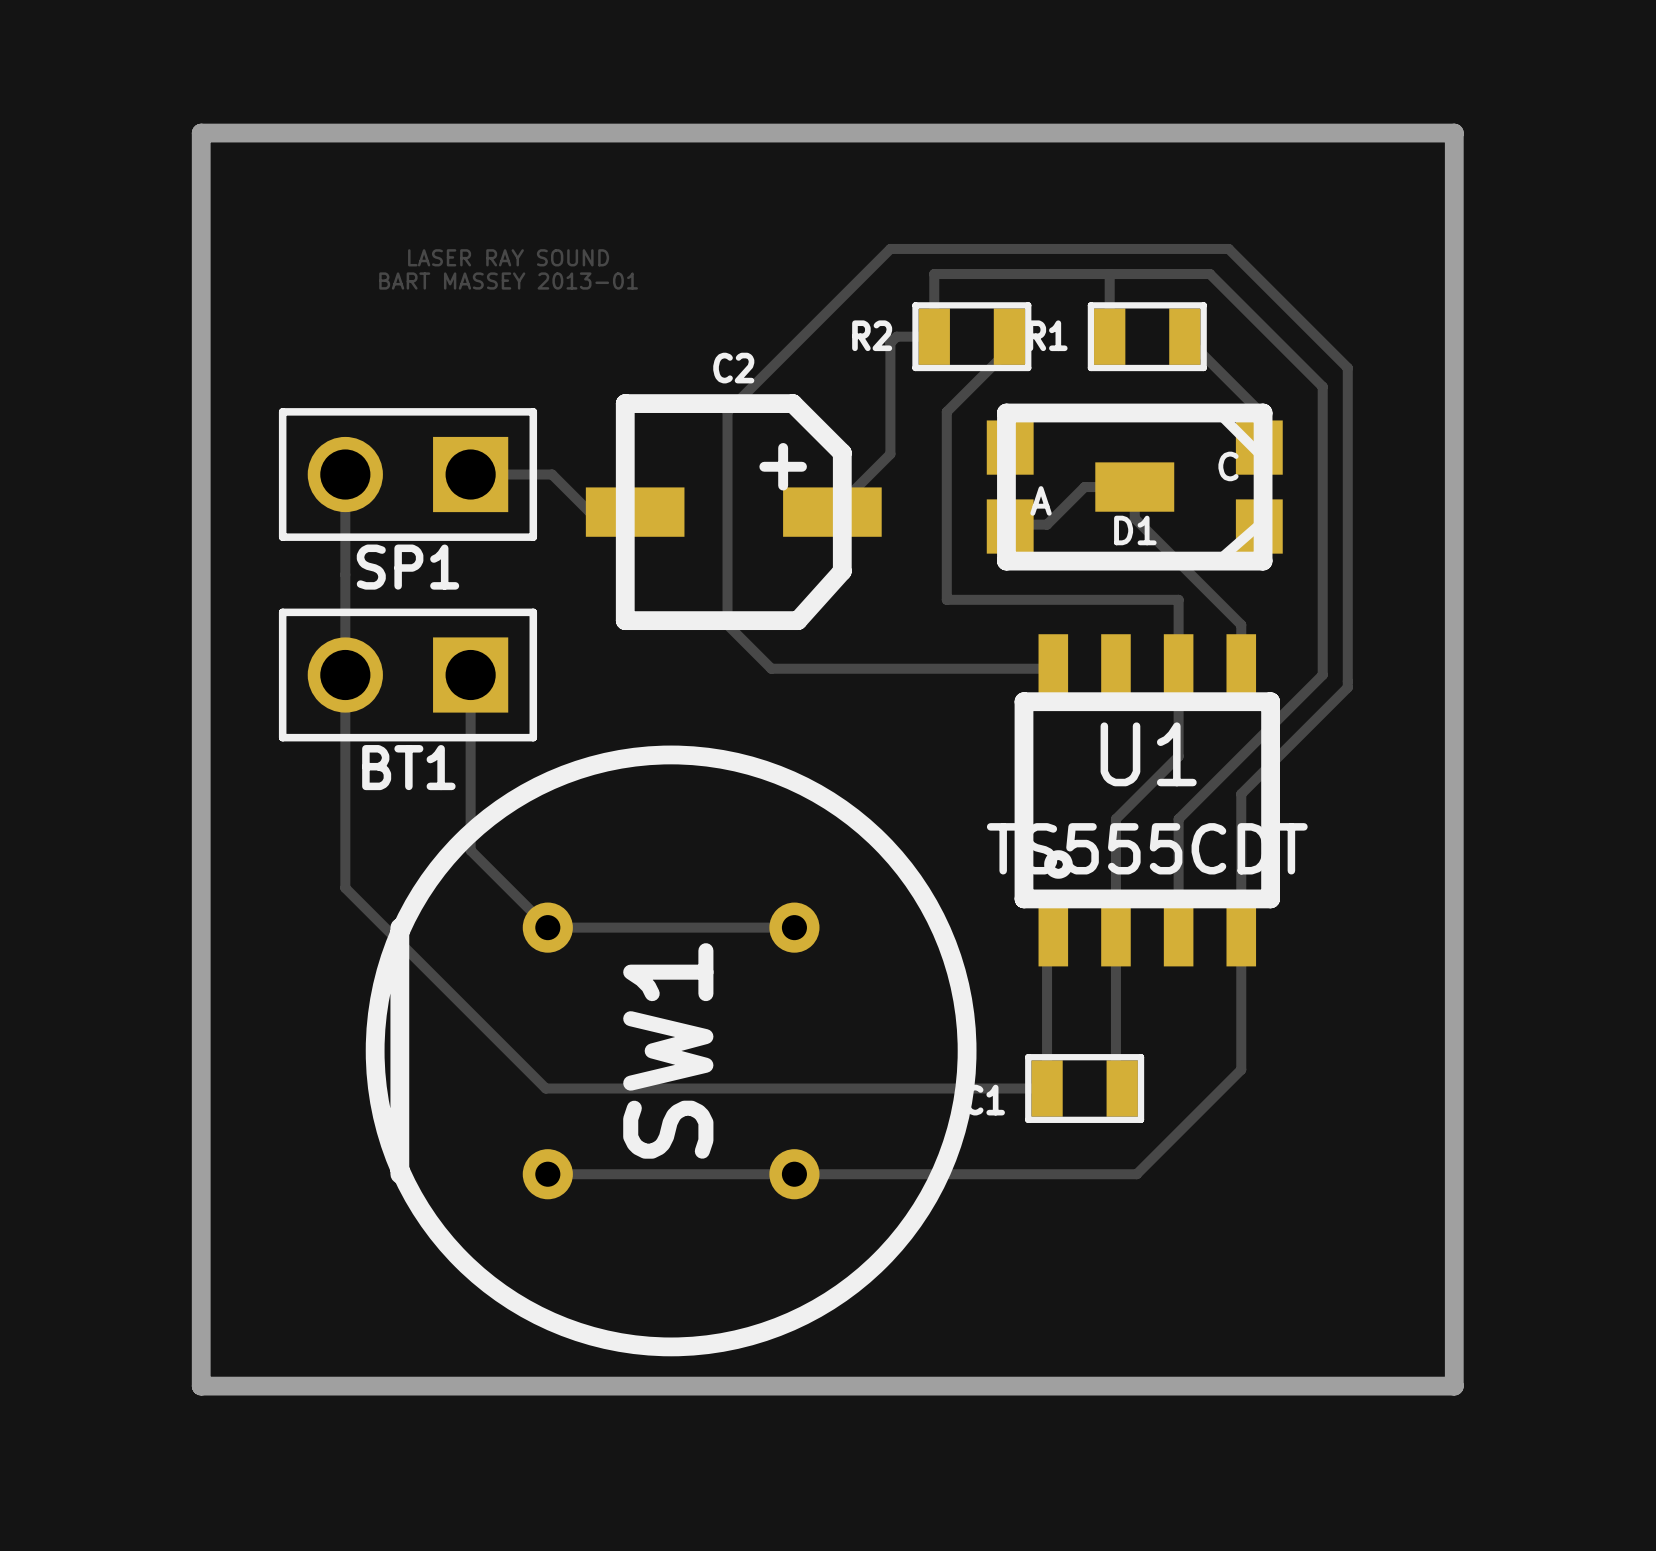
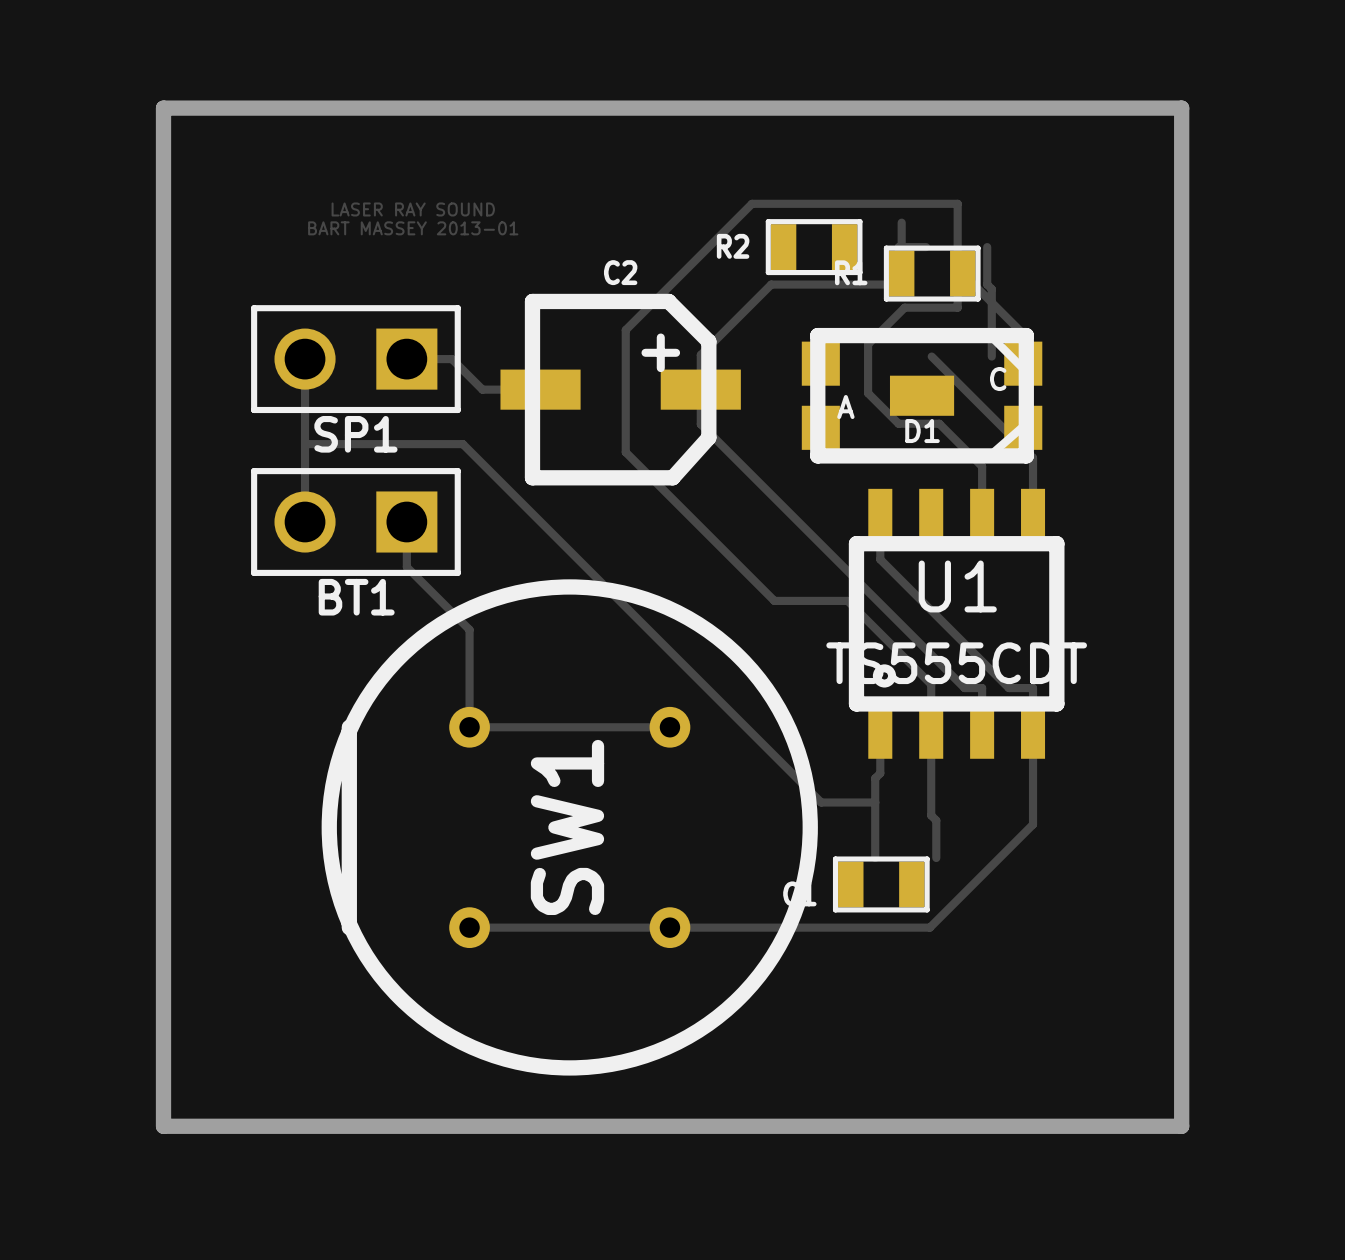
track: none -> (926, 247) (898, 247) (898, 274) (888, 284) (771, 284) (700, 355) (700, 424) (964, 688) (982, 688) (982, 730)
track: none -> (987, 247) (987, 284) (991, 289) (991, 356)
R2 position: (971, 336) -> (814, 247)
track: (1009, 336) (1009, 349) (946, 411) (946, 599) (1178, 599) (1178, 756) (1115, 819) (1115, 1082) (1122, 1088) -> none
track: none -> (931, 356) (1033, 457) (1033, 516)
track: none -> (305, 359) (305, 522)
track: none -> (406, 359) (451, 359) (482, 389) (540, 389)
track: (345, 474) (345, 888) (545, 1088) (1047, 1088) (1047, 938) (1053, 931) -> none
SP1 position: (407, 474) -> (355, 359)
track: (470, 474) (552, 474) (589, 512) (635, 512) -> none
C2 position: (733, 512) -> (620, 389)
track: (832, 512) (890, 454) (890, 342) (896, 336) (934, 336) (934, 274) (1209, 274) (1322, 386) (1322, 675) (1178, 819) (1178, 931) -> none
track: (1010, 526) (1012, 524) (1047, 524) (1084, 487) (1134, 487) (1134, 518) (1241, 624) (1241, 668) -> none
track: none -> (305, 444) (462, 444) (821, 802) (875, 802)
track: none -> (880, 516) (880, 559) (1008, 688) (1033, 688) (1033, 824) (929, 927) (469, 927)
track: none -> (982, 516) (982, 466) (939, 423) (898, 423) (868, 393) (868, 344) (904, 307) (957, 307) (957, 203) (752, 203) (625, 330) (625, 452) (774, 600) (847, 600) (931, 684) (931, 815) (936, 820) (936, 858)
track: none -> (406, 522) (406, 567) (469, 629) (469, 727) (669, 727)
track: (1053, 668) (771, 668) (727, 624) (727, 411) (890, 248) (1228, 248) (1347, 368) (1347, 687) (1241, 794) (1241, 1069) (1136, 1174) (547, 1174) -> none
BT1 position: (407, 675) -> (355, 522)
track: (470, 675) (470, 850) (547, 927) (794, 927) -> none
U1 position: (1147, 800) -> (956, 623)
track: none -> (880, 730) (880, 773) (875, 778) (875, 858)
SW1 position: (671, 1050) -> (569, 827)

